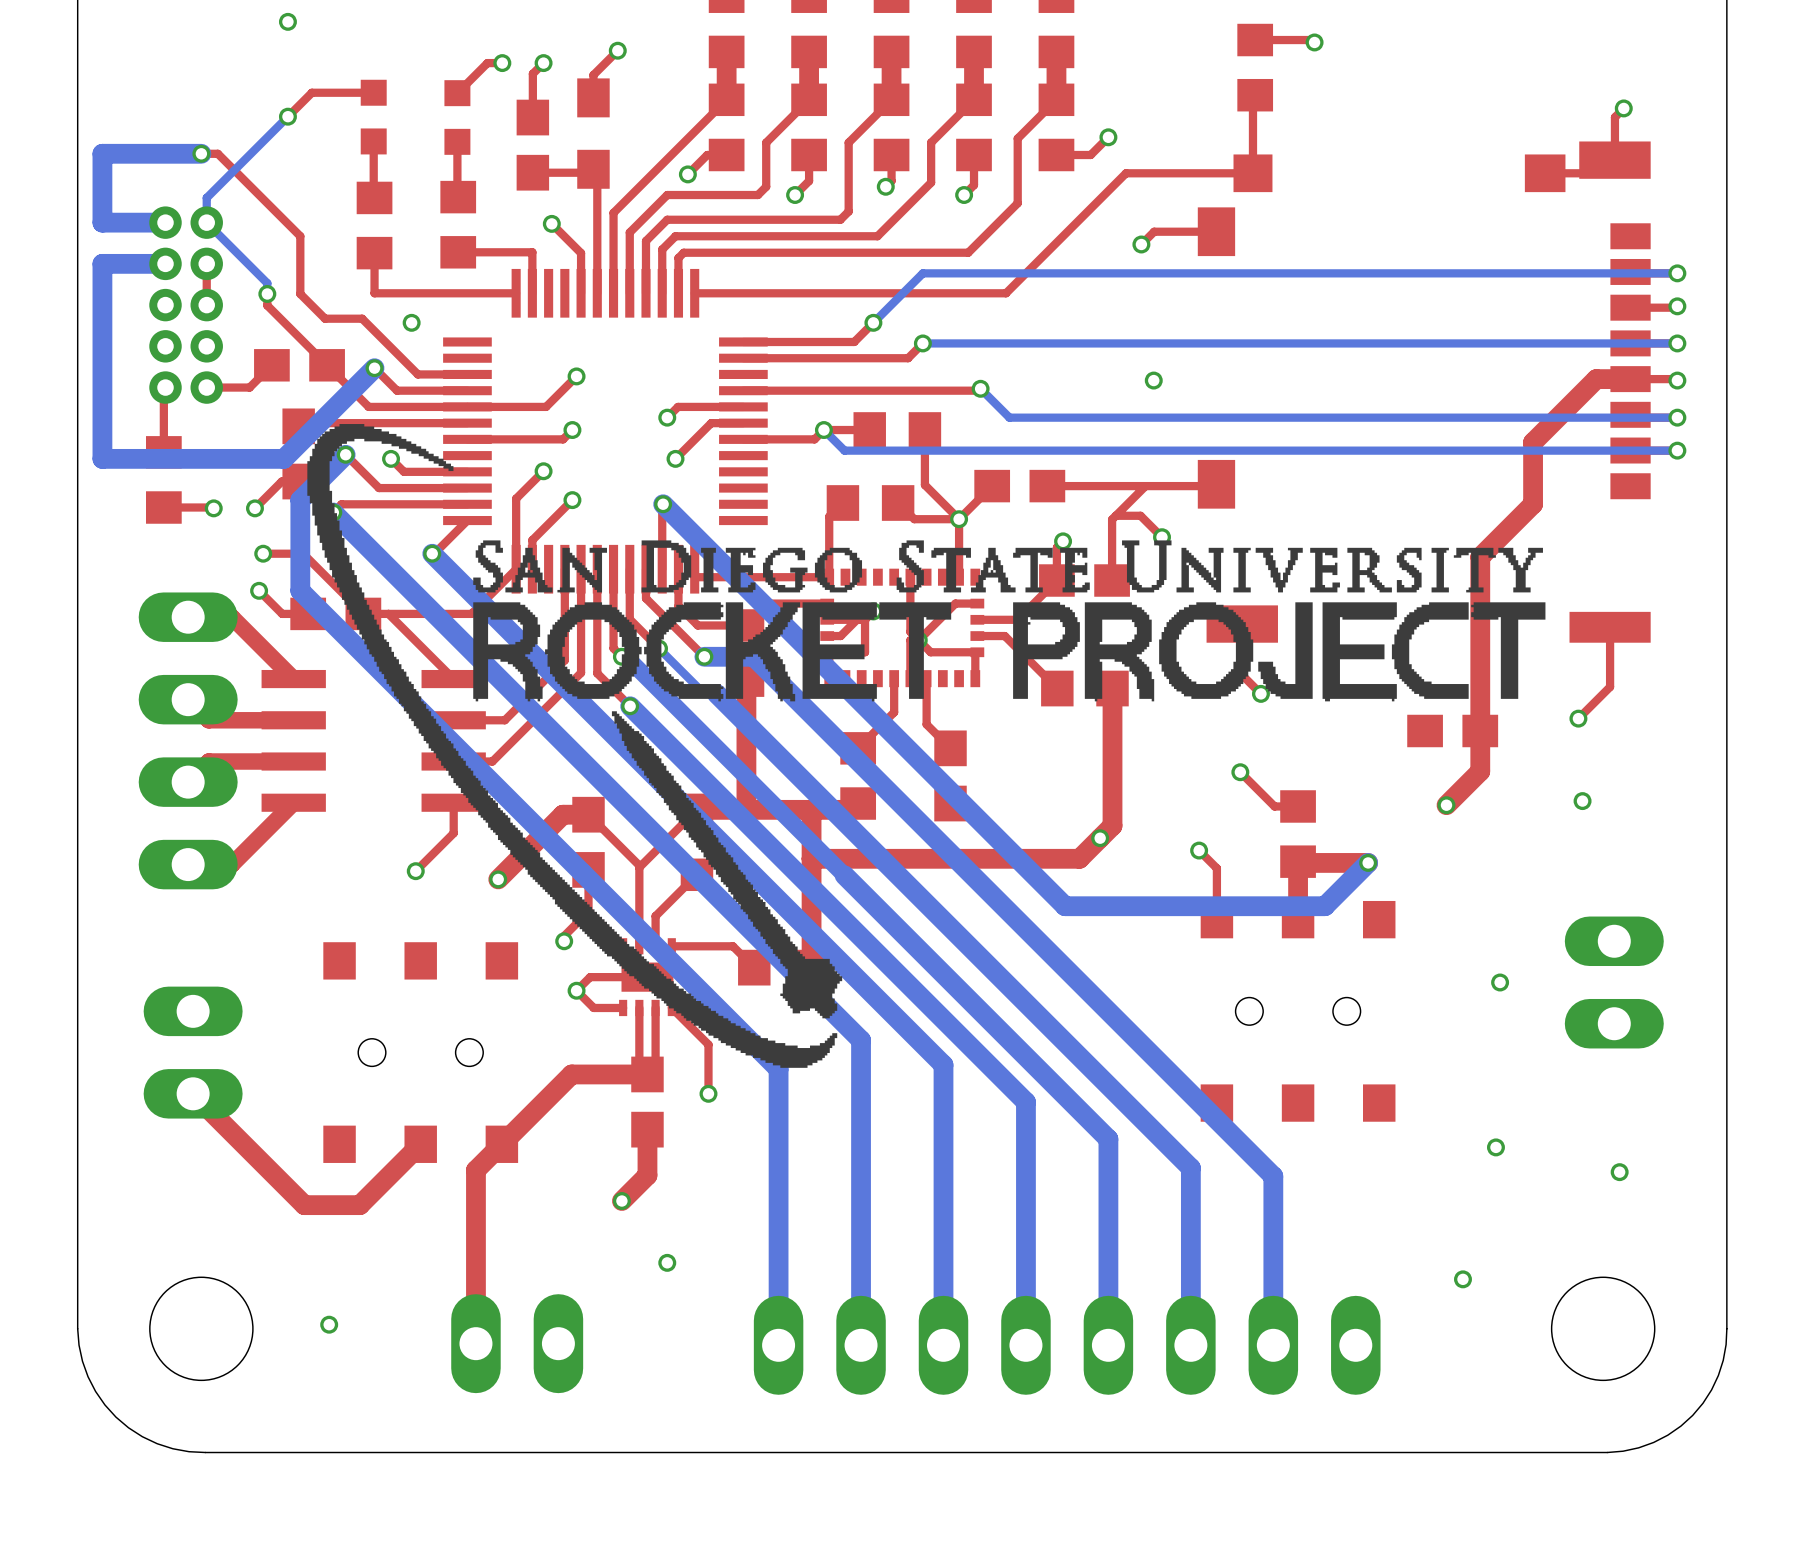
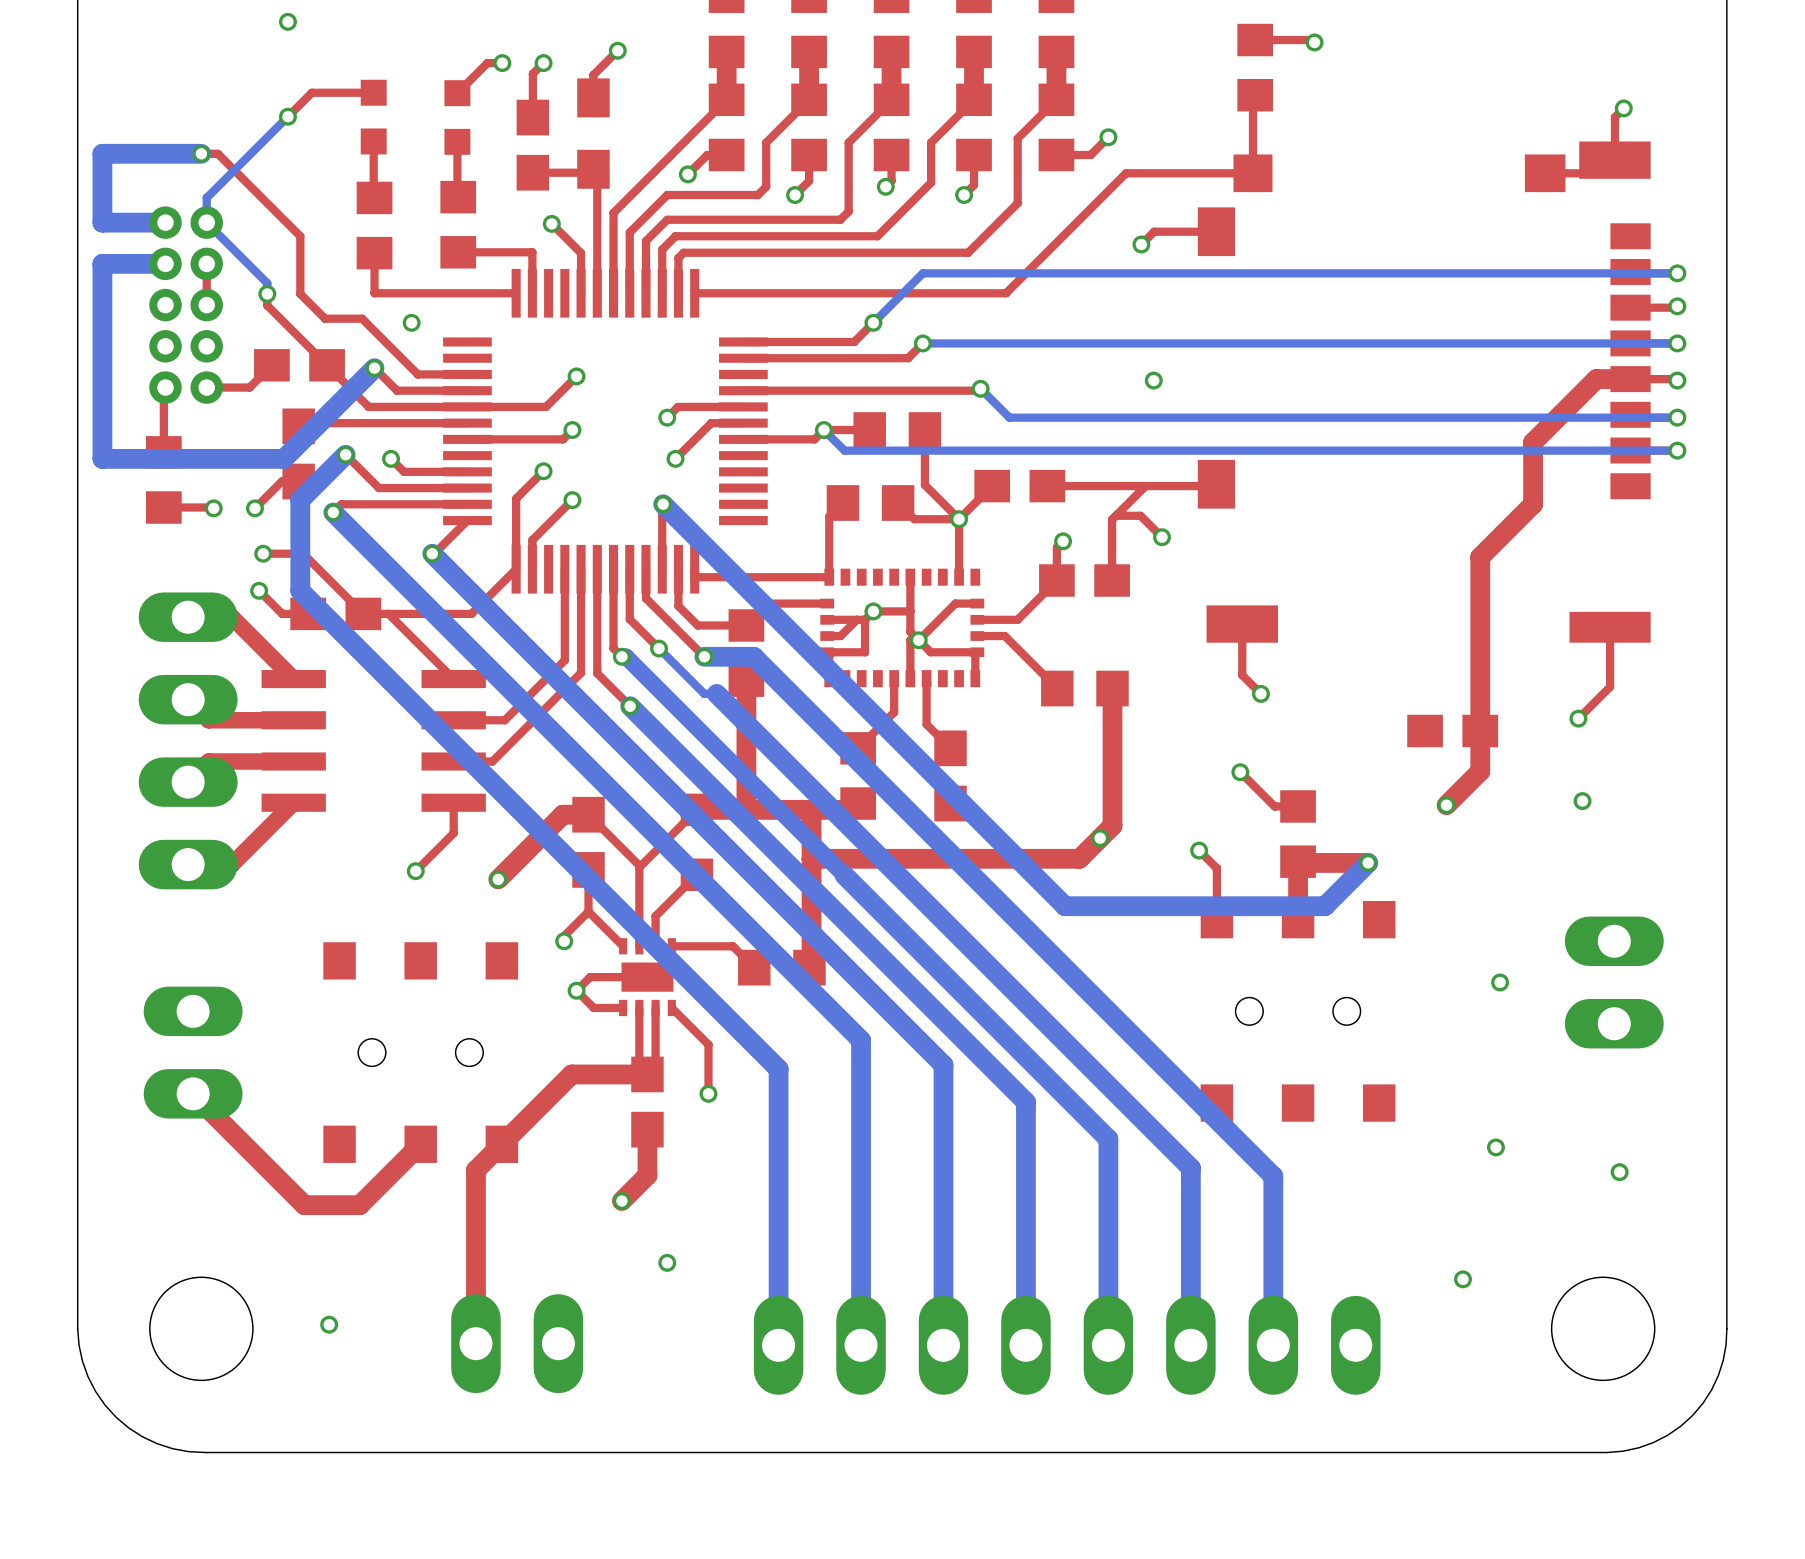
drawing: [307, 424, 1546, 1068] -> none

